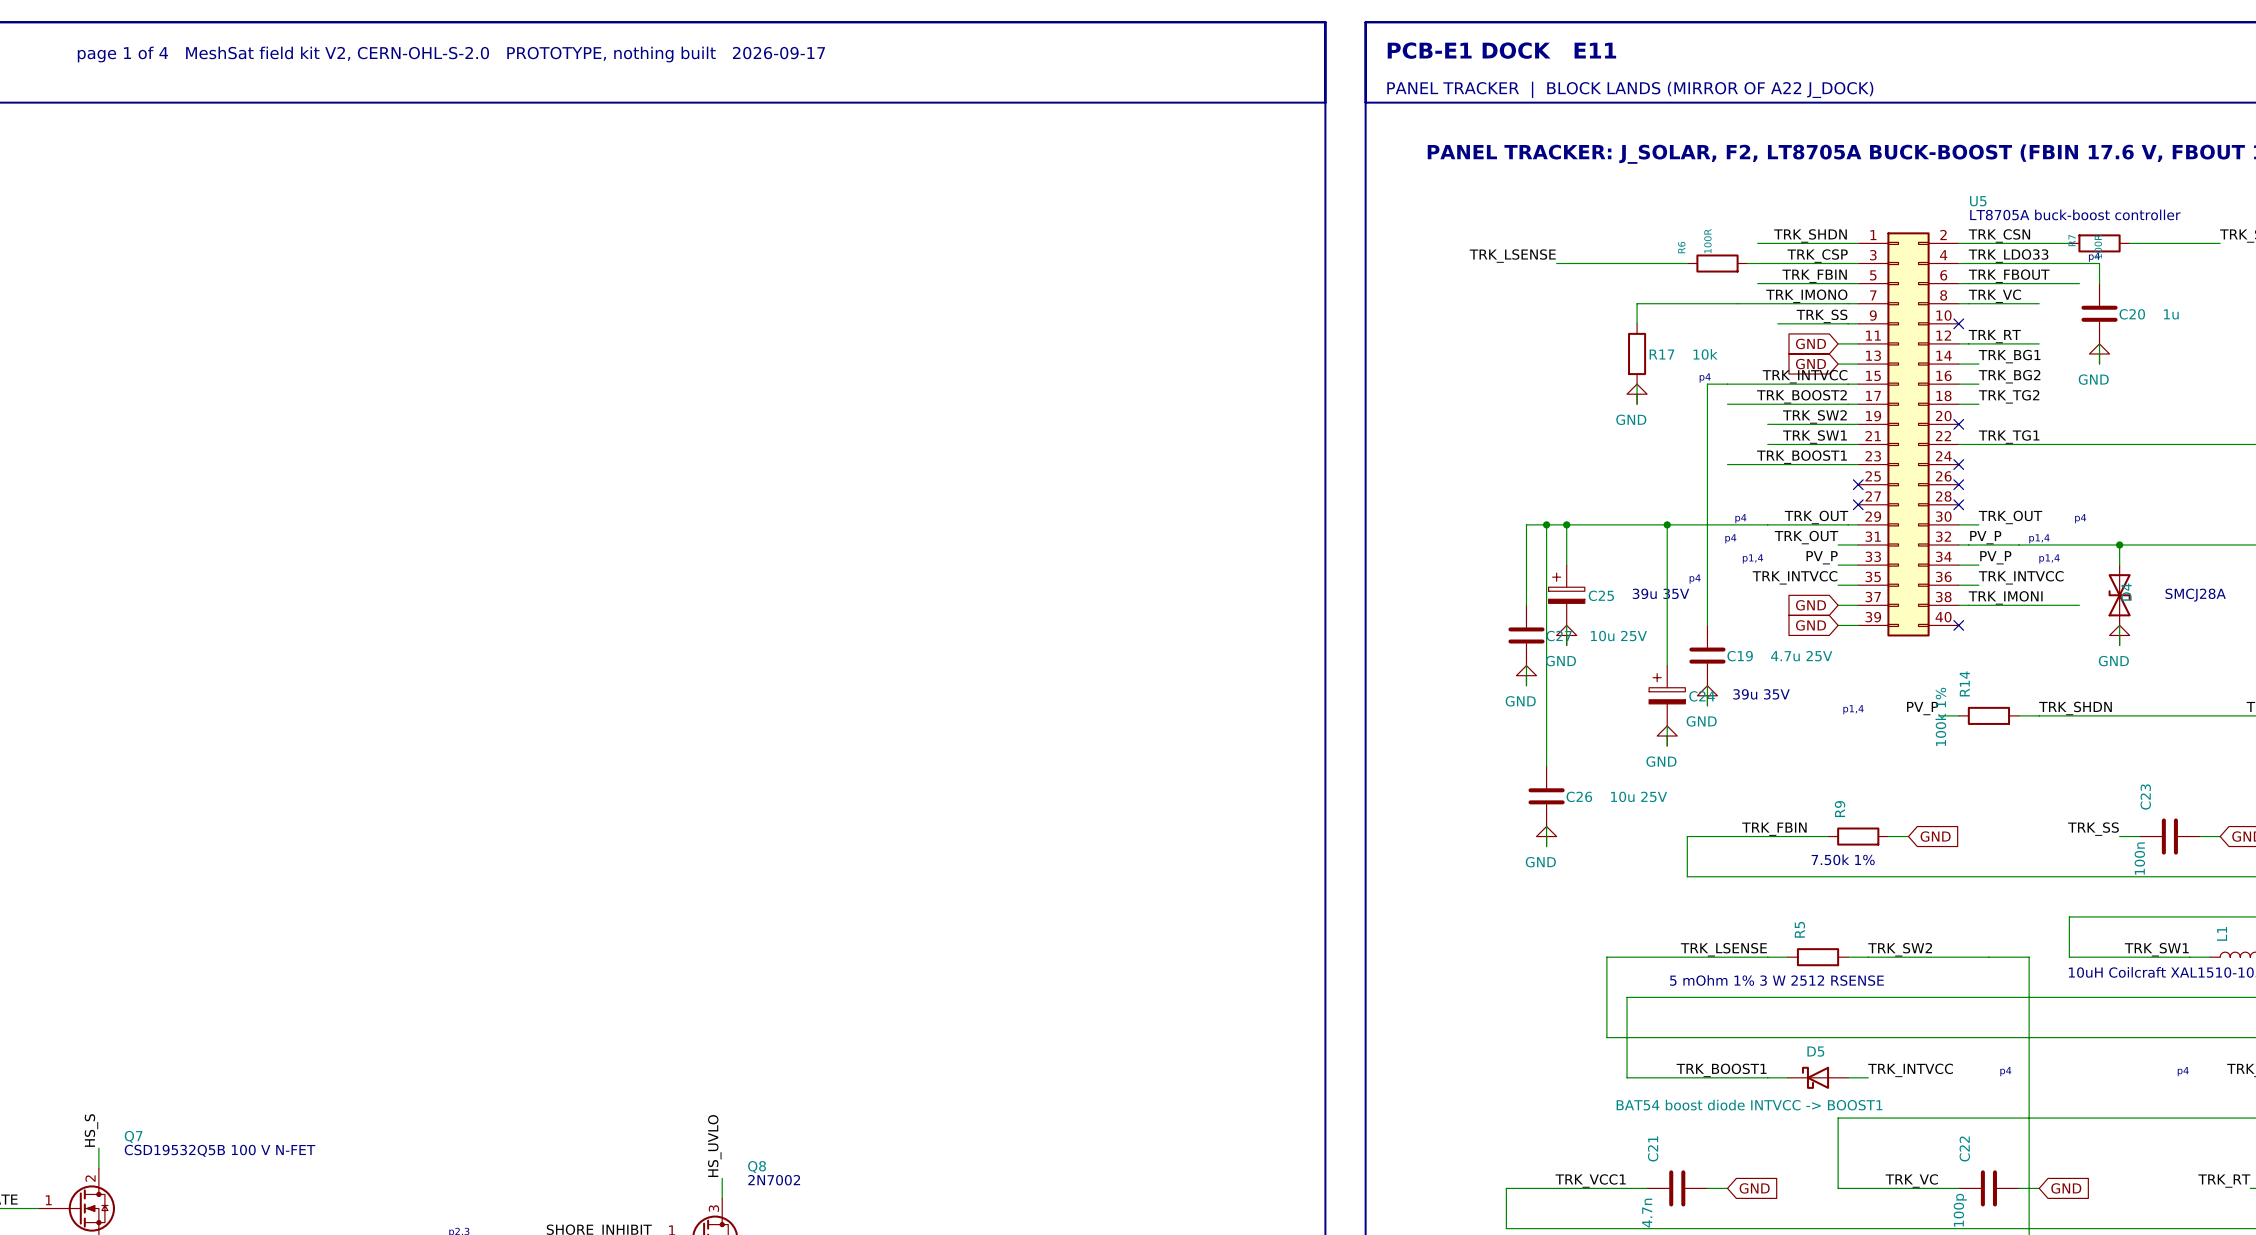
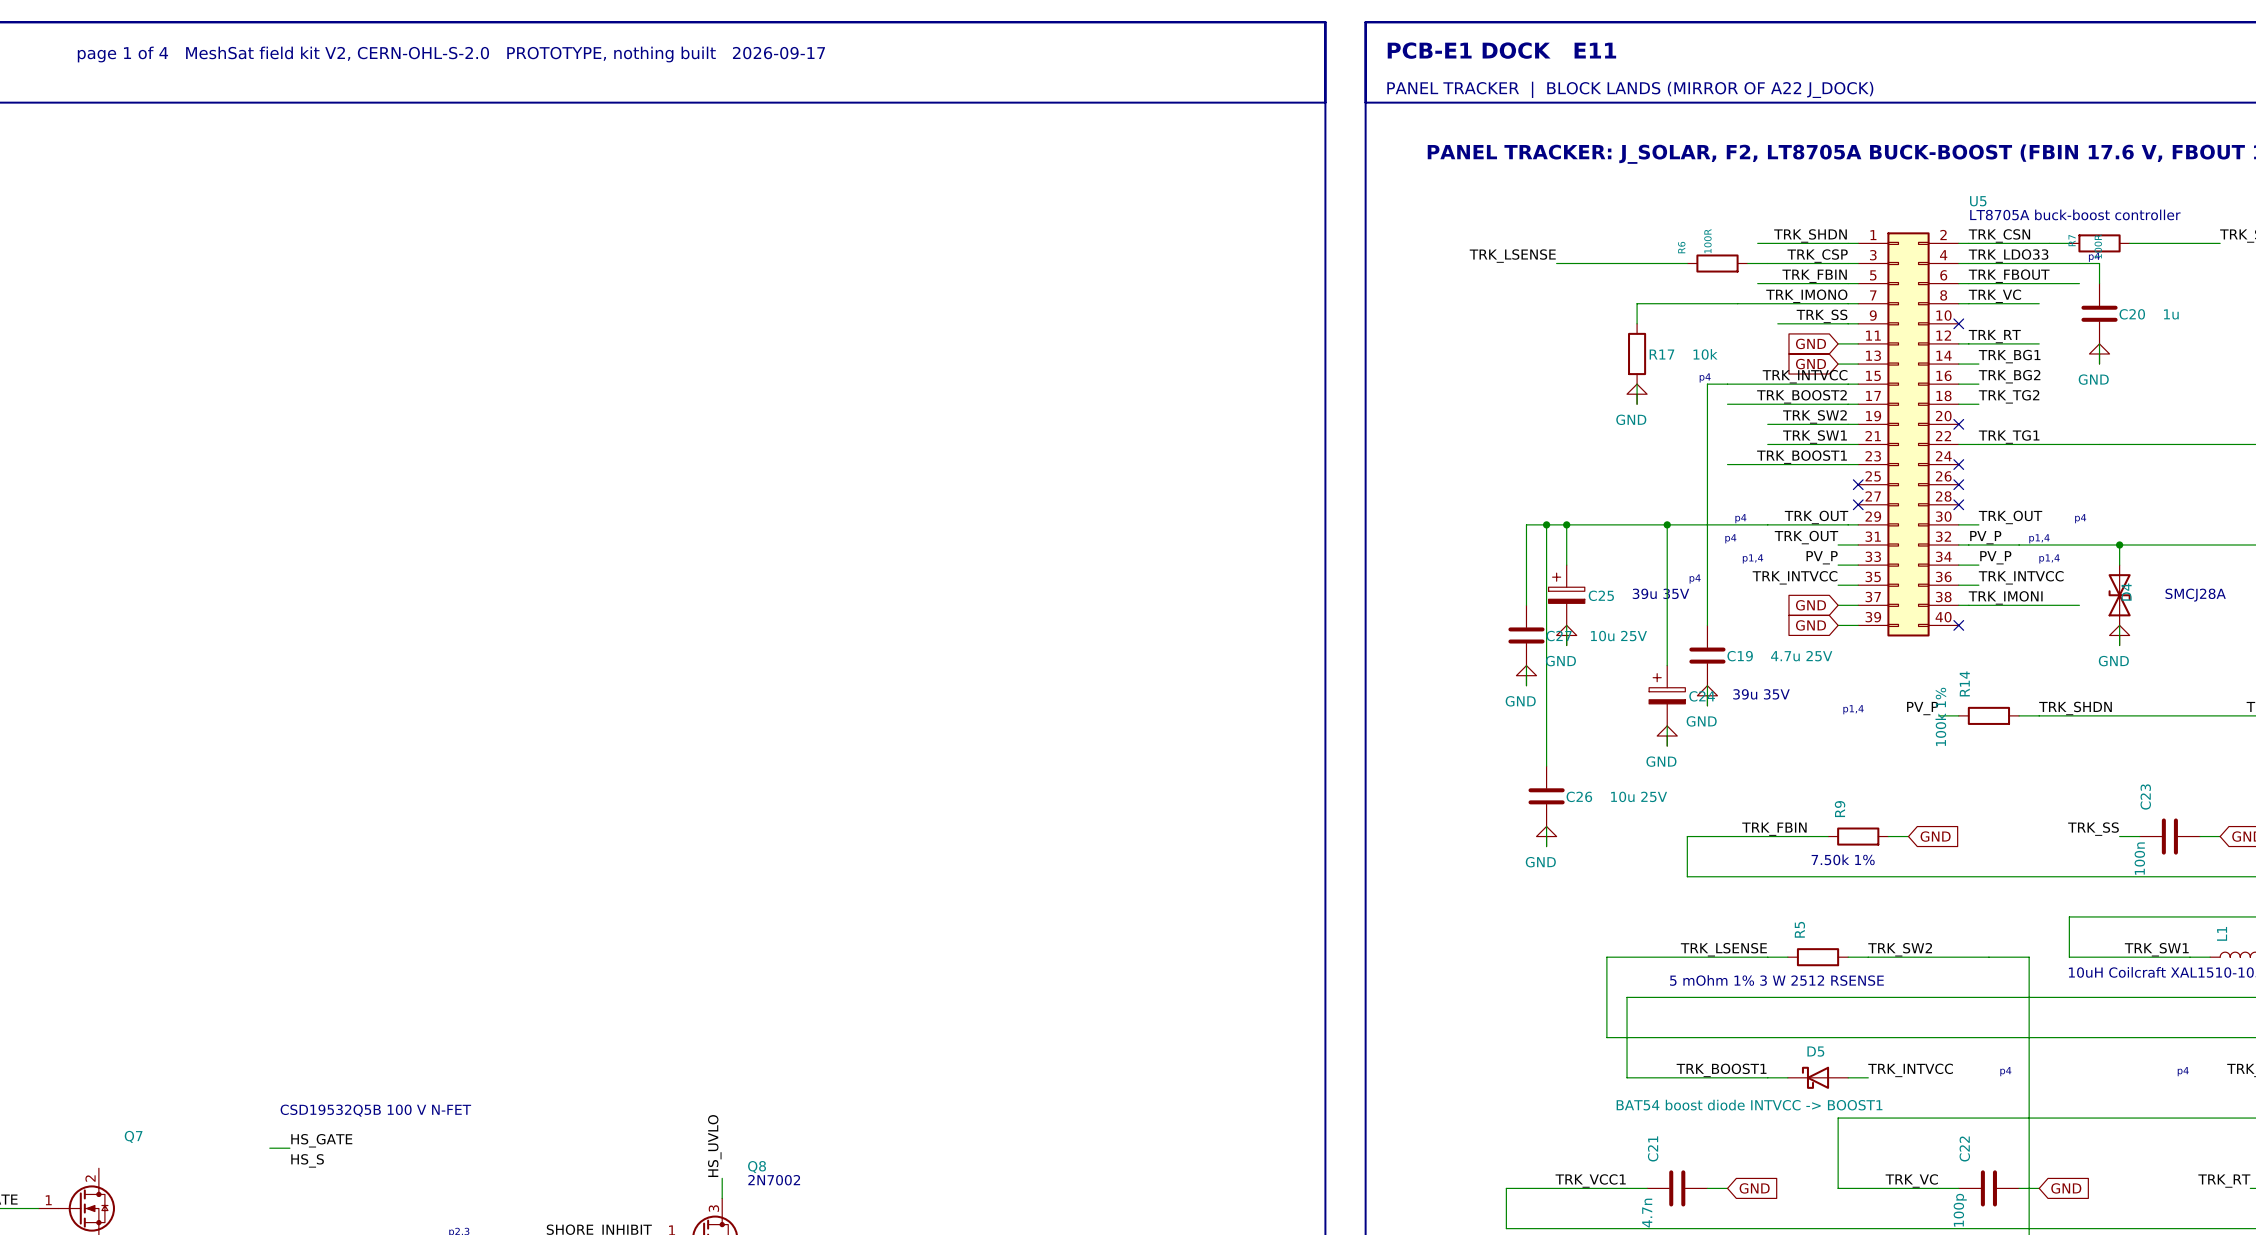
label rotation: 0° (91, 1130) -> 90° clockwise (307, 1160)
label position: HS_S (91, 1130) -> HS_S (307, 1160)
label: none -> HS_GATE (321, 1140)
wire: (98, 1148) (98, 1168) -> none
wire: none -> (269, 1148) (289, 1148)
text position: CSD19532Q5B 100 V N-FET (220, 1150) -> CSD19532Q5B 100 V N-FET (375, 1110)

